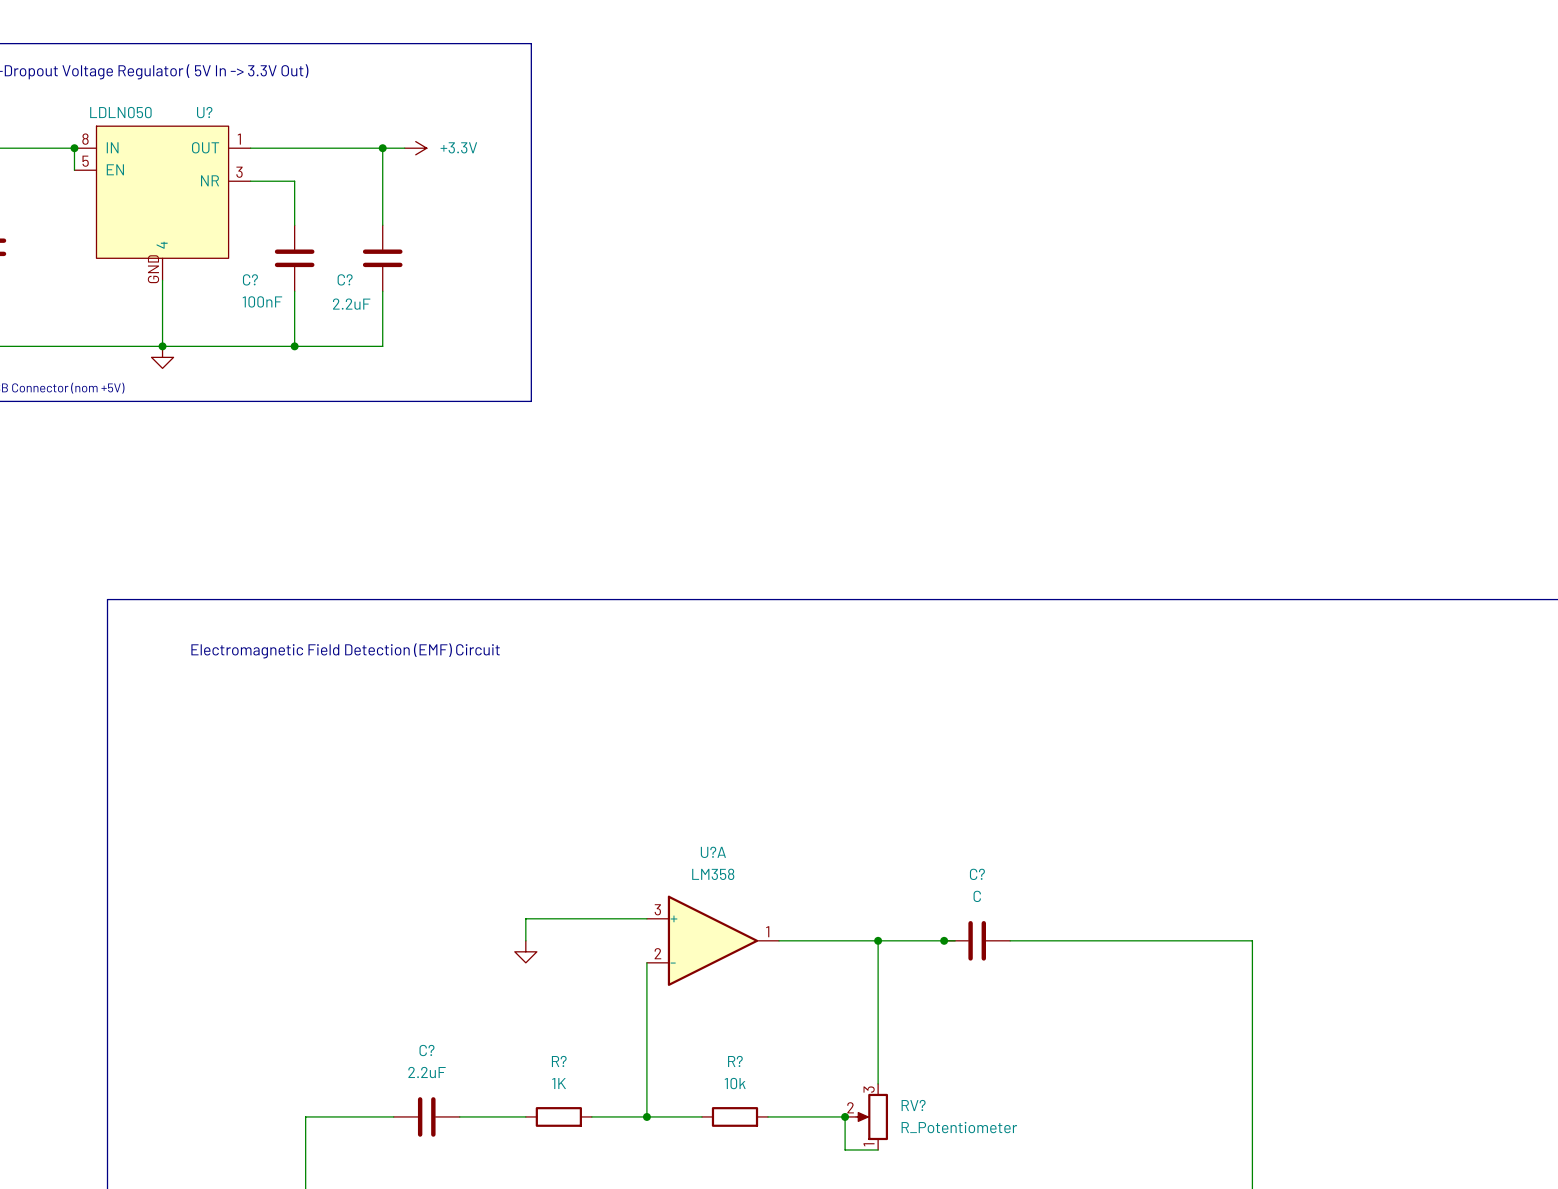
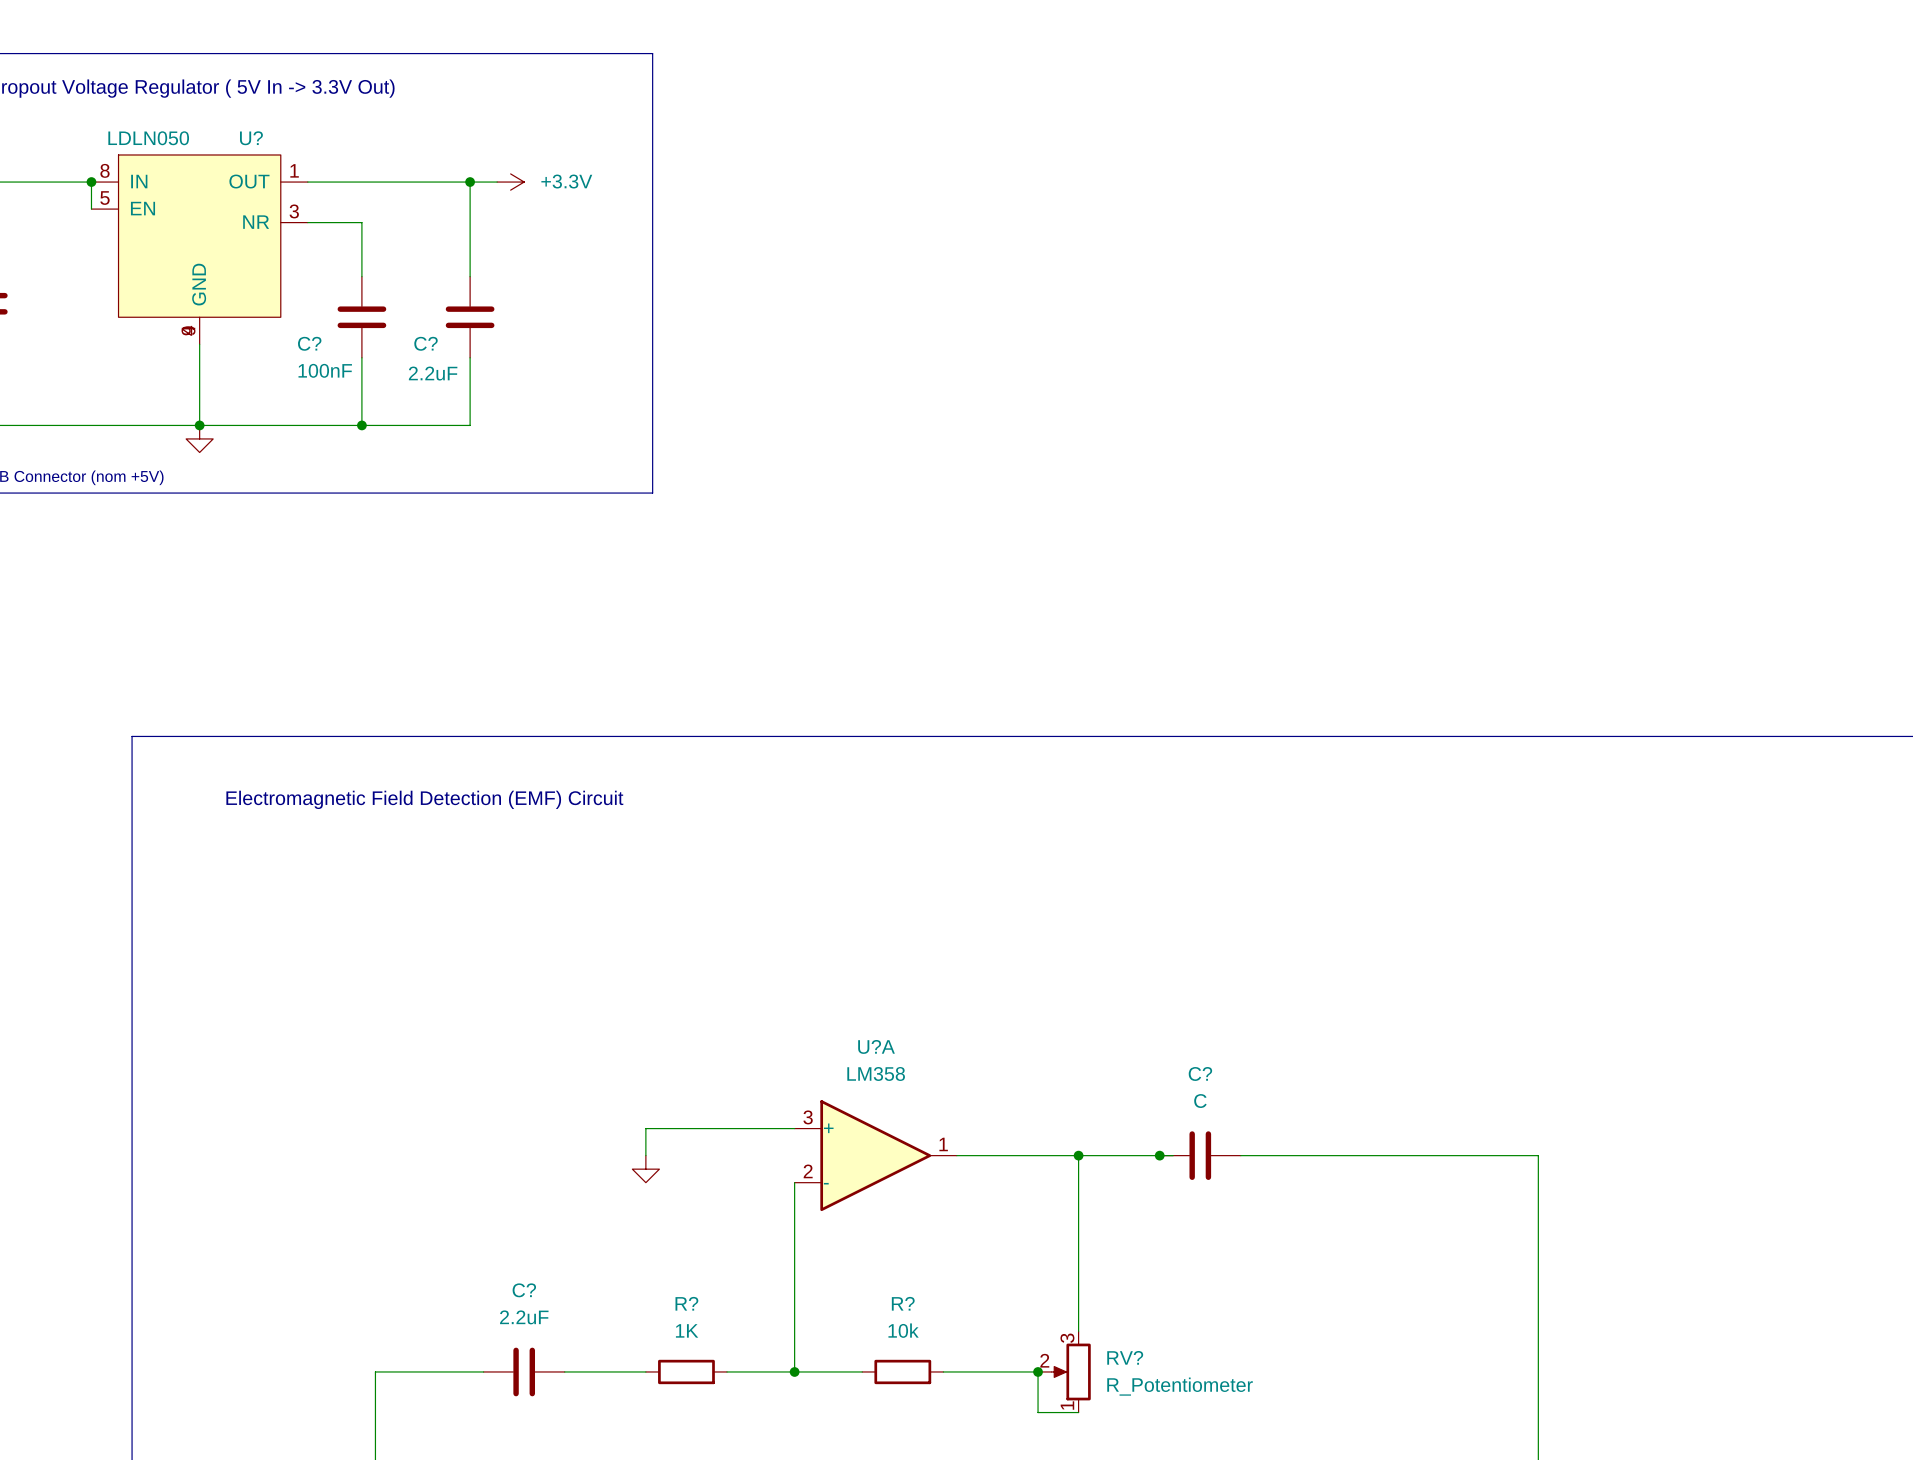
U? symbol: [74, 126, 251, 281] -> [91, 154, 308, 345]

